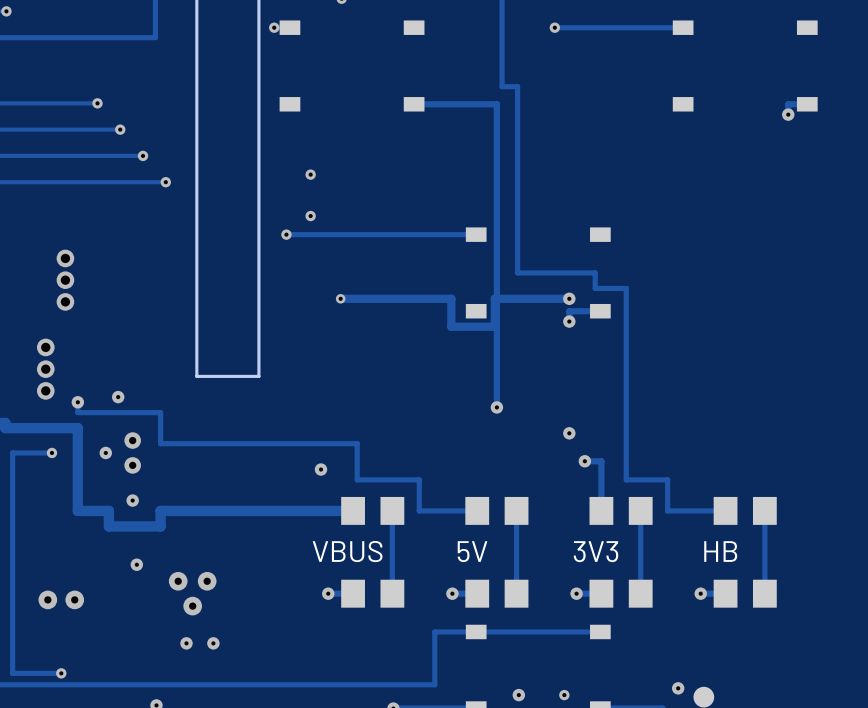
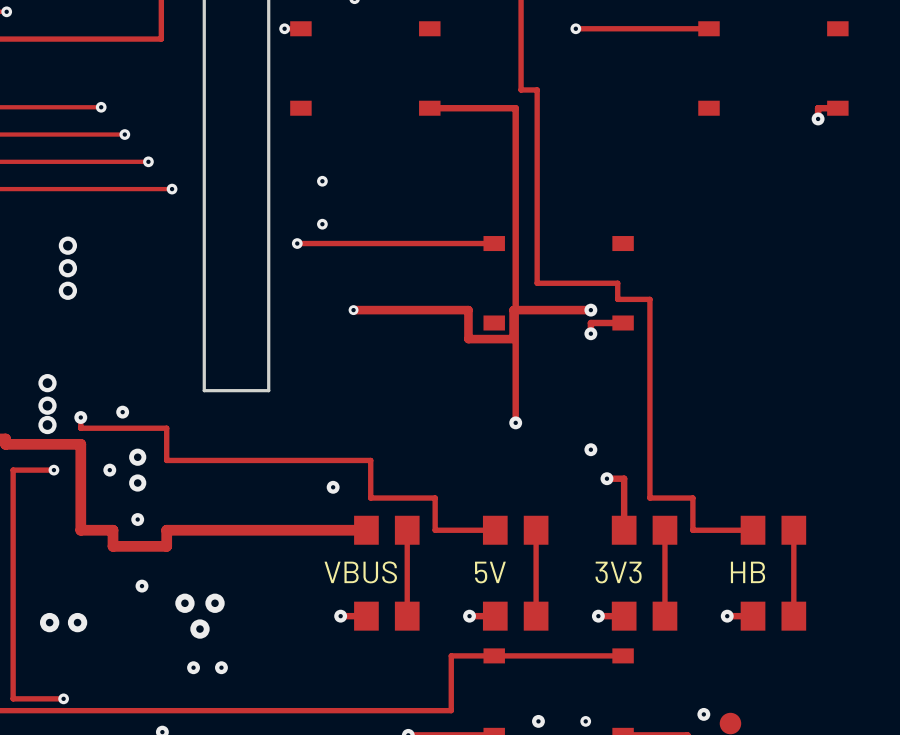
via: none -> (67, 245)
via: (65, 301) -> none
via: (45, 347) -> none
via: none -> (47, 425)

